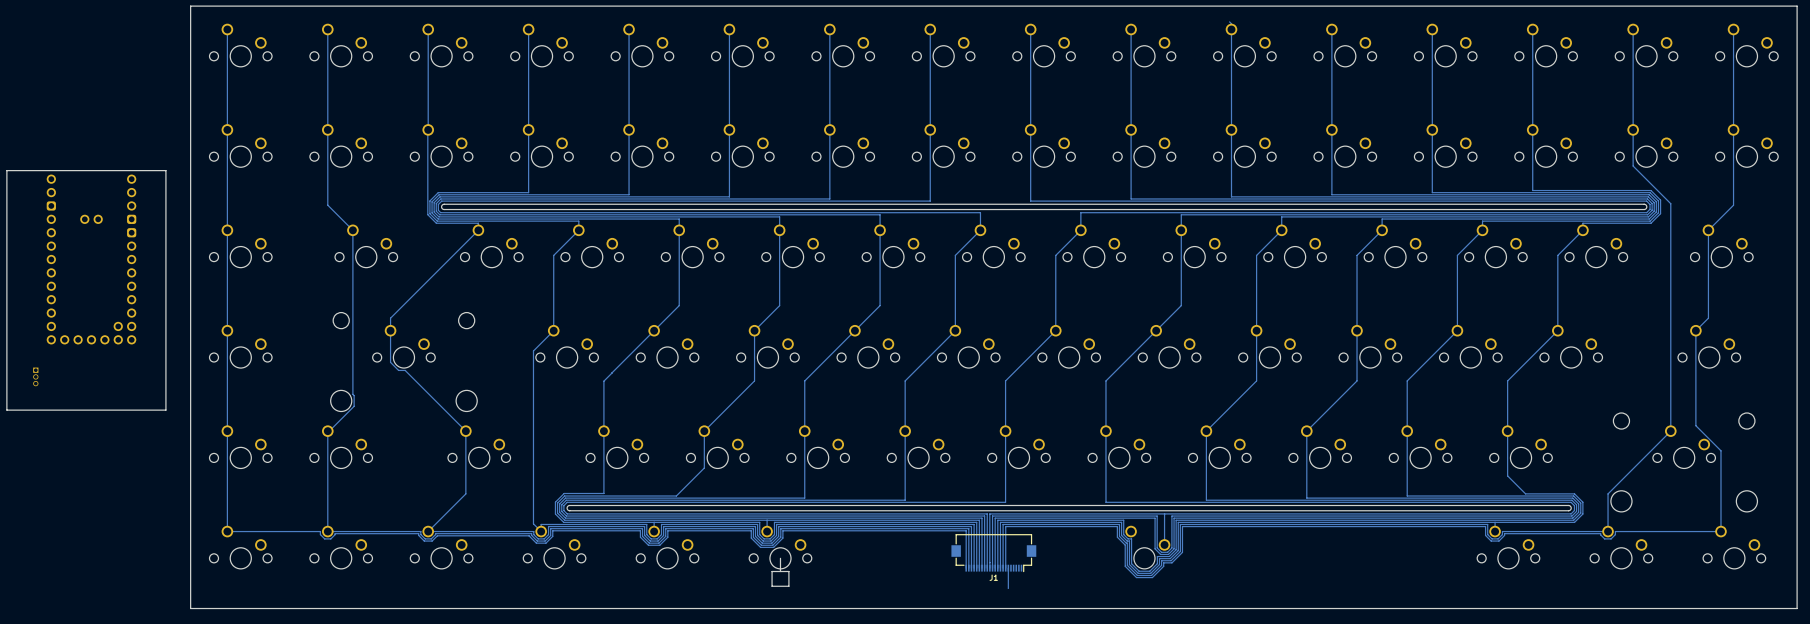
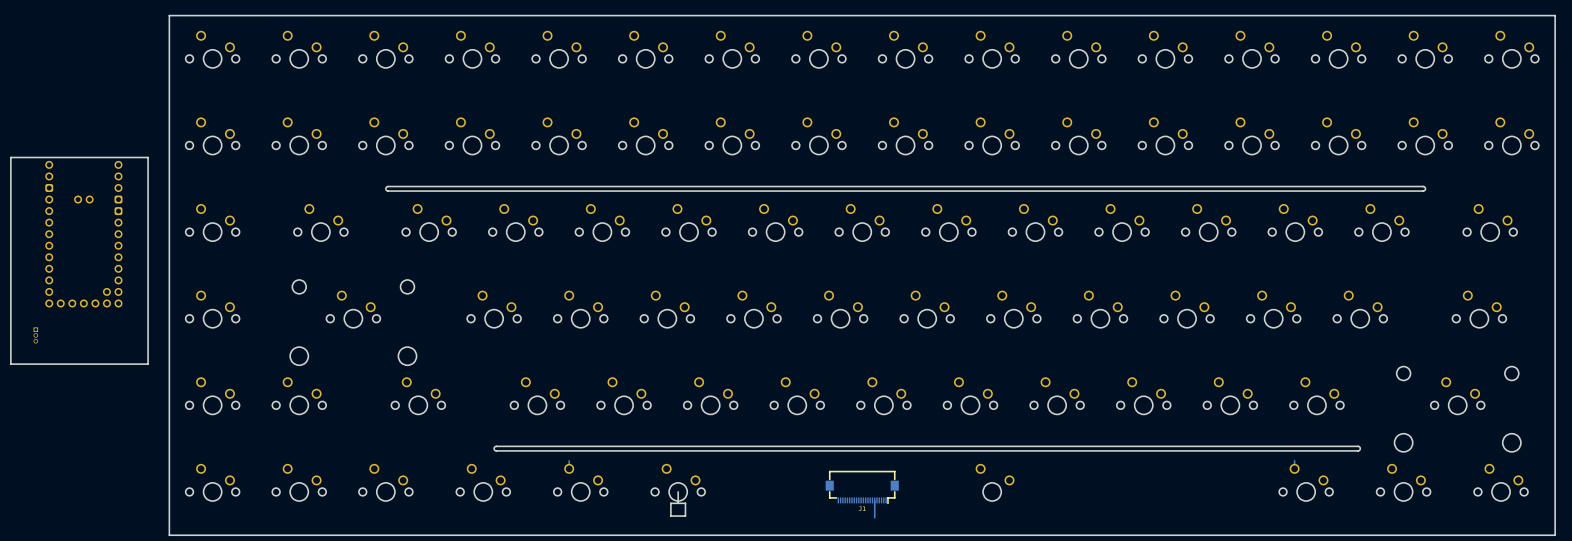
track: (1229, 21) (1231, 23) (1231, 196) (1648, 196) (1654, 202) (1654, 211) (1648, 216) (1281, 216) (1281, 230) (1256, 255) (1256, 380) (1206, 431) (1206, 500) (1571, 500) (1576, 504) (1576, 511) (1571, 516) (1171, 516) (1171, 548) (1167, 552) (1161, 552) (1157, 548) (1157, 516) (992, 516) (992, 568) -> none
track: (227, 29) (227, 531) (320, 531) (320, 534) (324, 538) (330, 538) (335, 533) (418, 533) (424, 541) (432, 541) (437, 535) (529, 535) -> none
track: (327, 29) (327, 205) (352, 230) (354, 395) (354, 406) (327, 431) (327, 531) (420, 531) (420, 534) (425, 538) (431, 538) (435, 533) (531, 533) (537, 541) (545, 541) (550, 535) (550, 528) (642, 528) (642, 536) (649, 543) (658, 543) (665, 536) (665, 528) (753, 528) (753, 537) (761, 545) (772, 545) (780, 537) (780, 528) (968, 528) (968, 568) -> none
track: (428, 29) (427, 214) (436, 223) (478, 223) (478, 230) (390, 318) (390, 362) (398, 370) (405, 370) (465, 431) (465, 493) (428, 531) (533, 531) (533, 534) (538, 538) (544, 538) (548, 534) (548, 526) (644, 526) (644, 535) (650, 541) (658, 541) (663, 535) (663, 526) (755, 526) (755, 536) (762, 543) (771, 543) (778, 536) (778, 526) (971, 526) (971, 568) -> none
track: (528, 29) (528, 192) (438, 192) (429, 200) (429, 213) (437, 221) (578, 221) (578, 230) (553, 255) (553, 330) (533, 350) (533, 523) (541, 531) (541, 524) (646, 524) (646, 534) (651, 538) (657, 538) (661, 534) (661, 524) (757, 524) (757, 535) (763, 541) (771, 541) (776, 535) (776, 524) -> none
track: (629, 29) (629, 194) (439, 194) (432, 201) (432, 212) (438, 219) (679, 219) (679, 305) (603, 381) (603, 493) (564, 493) (555, 502) (555, 514) (563, 522) (759, 522) (759, 534) (764, 538) (770, 538) (774, 534) (774, 522) (976, 522) (976, 568) -> none
track: (729, 29) (729, 196) (440, 196) (434, 202) (434, 212) (438, 216) (779, 216) (779, 305) (754, 330) (754, 380) (704, 431) (704, 468) (676, 496) (564, 496) (557, 503) (557, 513) (564, 520) (979, 520) (979, 568) -> none
track: (829, 29) (829, 198) (440, 198) (436, 203) (436, 211) (439, 214) (880, 214) (880, 305) (804, 380) (804, 498) (565, 498) (559, 503) (559, 512) (565, 518) (981, 518) (981, 568) -> none
track: (930, 29) (930, 201) (441, 201) (438, 204) (438, 210) (440, 212) (980, 212) (980, 230) (955, 255) (955, 330) (905, 380) (905, 500) (566, 500) (561, 504) (561, 511) (566, 516) (984, 516) (984, 568) -> none
track: (1030, 29) (1030, 201) (1646, 201) (1650, 204) (1650, 209) (1646, 212) (1080, 212) (1080, 230) (1055, 255) (1055, 330) (1005, 380) (1005, 502) (567, 502) (563, 505) (563, 510) (567, 513) (987, 513) (987, 568) -> none
track: (1131, 29) (1131, 198) (1647, 198) (1652, 203) (1652, 210) (1647, 214) (1181, 214) (1181, 305) (1105, 380) (1105, 502) (1571, 502) (1574, 505) (1574, 510) (1571, 513) (989, 513) (989, 568) -> none
track: (1331, 29) (1331, 194) (1649, 194) (1656, 201) (1656, 211) (1649, 219) (1382, 219) (1382, 230) (1357, 255) (1357, 380) (1306, 431) (1306, 498) (1572, 498) (1578, 503) (1578, 512) (1572, 518) (1174, 518) (1174, 548) (1168, 554) (1160, 554) (1155, 548) (1155, 518) (995, 518) (995, 568) -> none
track: (1432, 29) (1432, 192) (1650, 192) (1658, 200) (1658, 212) (1650, 221) (1482, 221) (1482, 230) (1457, 255) (1457, 330) (1407, 380) (1407, 496) (1573, 496) (1580, 503) (1580, 513) (1573, 520) (1176, 520) (1176, 549) (1169, 556) (1157, 556) (1157, 563) (1149, 571) (1139, 571) (1131, 563) (1131, 538) (1128, 538) (1123, 534) (1123, 520) (997, 520) (997, 568) -> none
track: (1532, 29) (1532, 190) (1651, 190) (1660, 200) (1660, 213) (1651, 223) (1582, 223) (1582, 230) (1557, 255) (1557, 330) (1507, 380) (1507, 475) (1525, 493) (1574, 493) (1582, 502) (1582, 514) (1574, 522) (1178, 522) (1178, 550) (1170, 558) (1159, 558) (1159, 564) (1150, 573) (1138, 573) (1129, 564) (1129, 541) (1121, 535) (1121, 522) (1000, 522) (1000, 568) -> none
track: (1633, 29) (1633, 166) (1670, 203) (1670, 431) (1608, 493) (1608, 531) (1502, 531) (1502, 534) (1498, 538) (1492, 538) (1487, 534) (1487, 524) (1180, 524) (1180, 551) (1171, 560) (1161, 560) (1161, 565) (1151, 575) (1137, 575) (1127, 565) (1127, 543) (1119, 536) (1119, 524) (1003, 524) (1003, 568) -> none
track: (1733, 29) (1733, 205) (1708, 230) (1708, 318) (1695, 330) (1695, 425) (1720, 450) (1720, 531) (1615, 531) (1615, 534) (1611, 538) (1604, 538) (1600, 533) (1504, 533) (1499, 541) (1491, 541) (1485, 535) (1485, 526) (1182, 526) (1182, 552) (1171, 562) (1163, 562) (1163, 566) (1152, 577) (1136, 577) (1125, 566) (1125, 545) (1117, 537) (1117, 526) (1005, 526) (1005, 568) -> none
track: (1164, 513) (1164, 544) -> none
track: (767, 520) (767, 531) -> none
track: (776, 524) (974, 524) (974, 568) -> none
track: (529, 535) (536, 543) (545, 543) (552, 536) (552, 530) (640, 530) (640, 537) (648, 545) (659, 545) (667, 537) (667, 530) (751, 530) (751, 538) (760, 547) (773, 547) (782, 538) (782, 530) (966, 530) (966, 568) -> none

